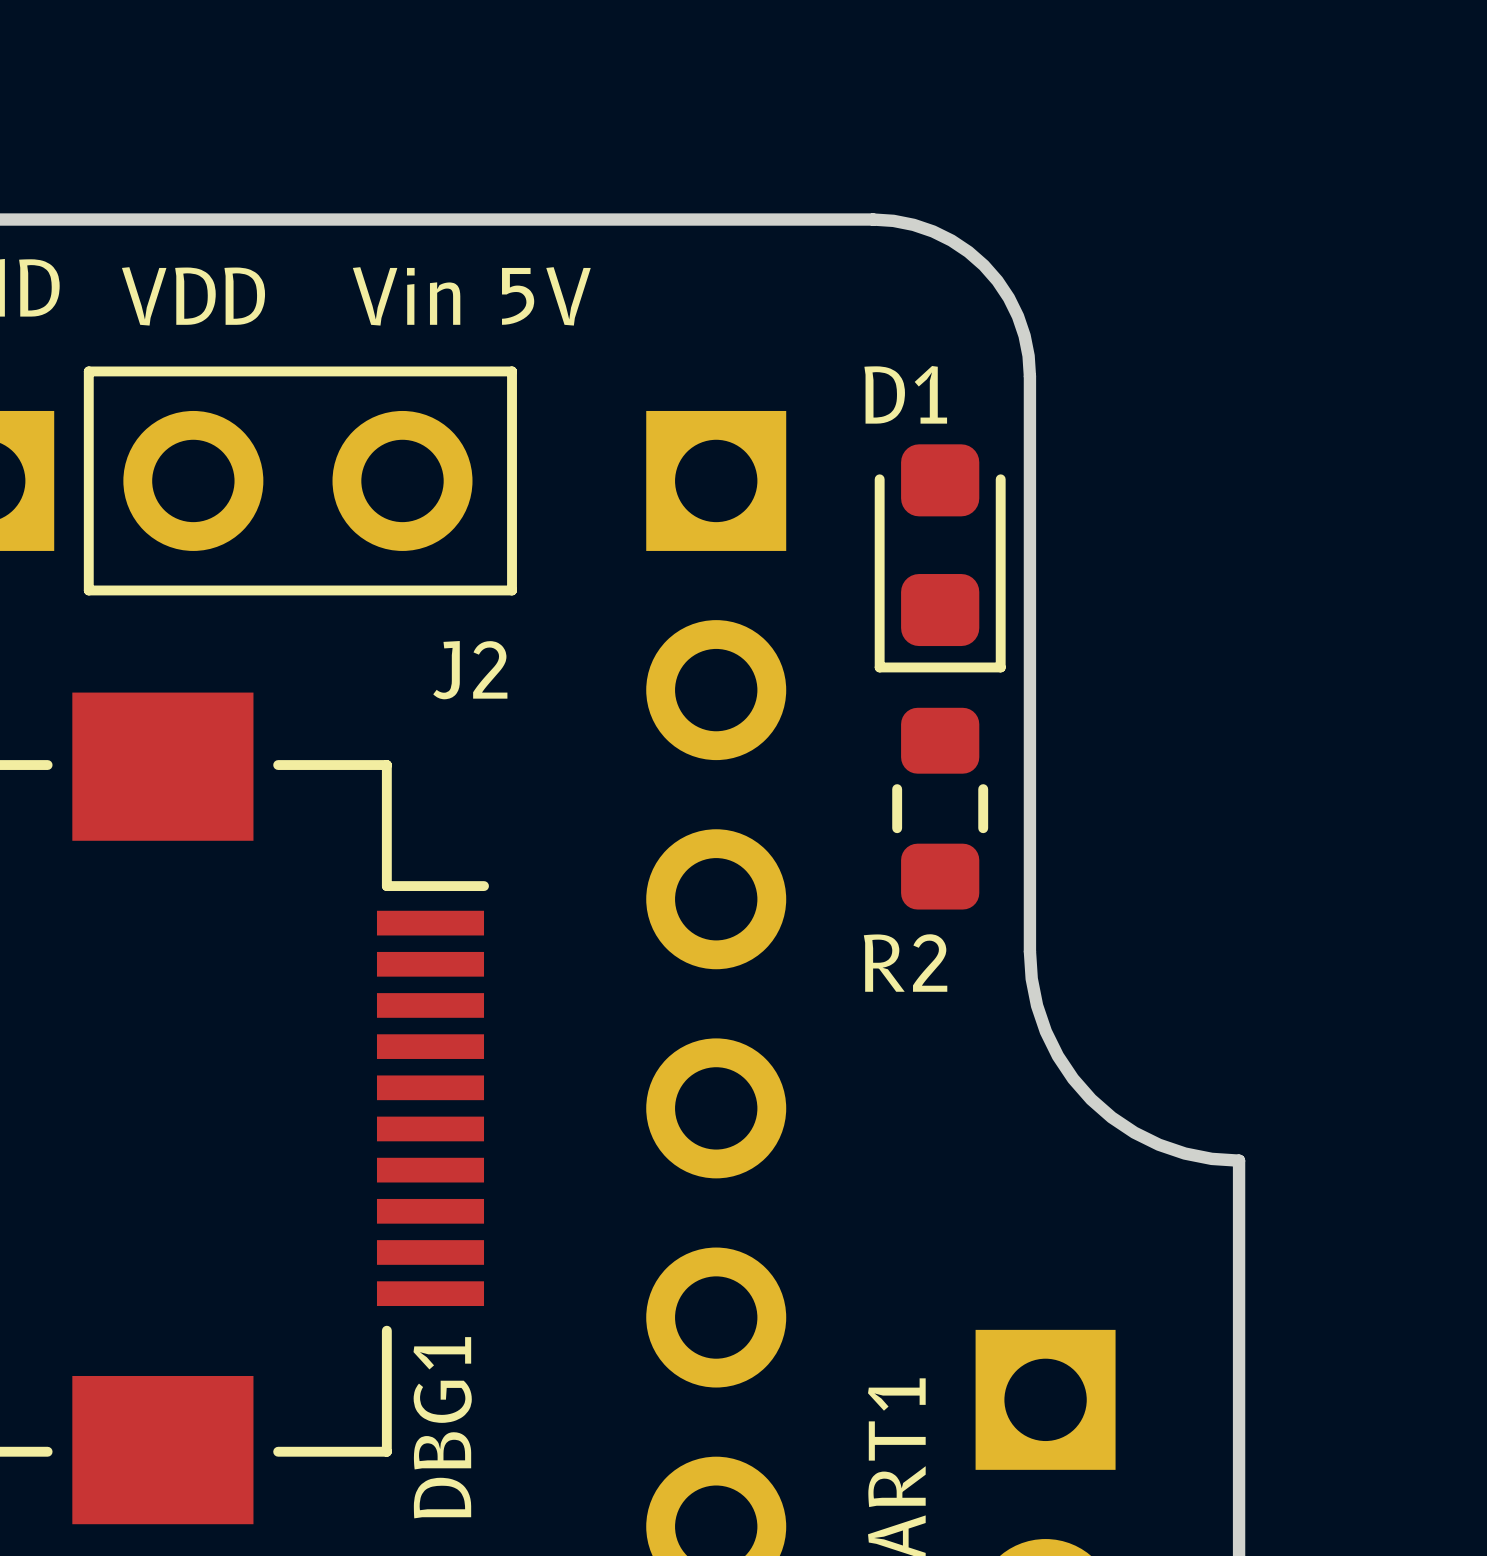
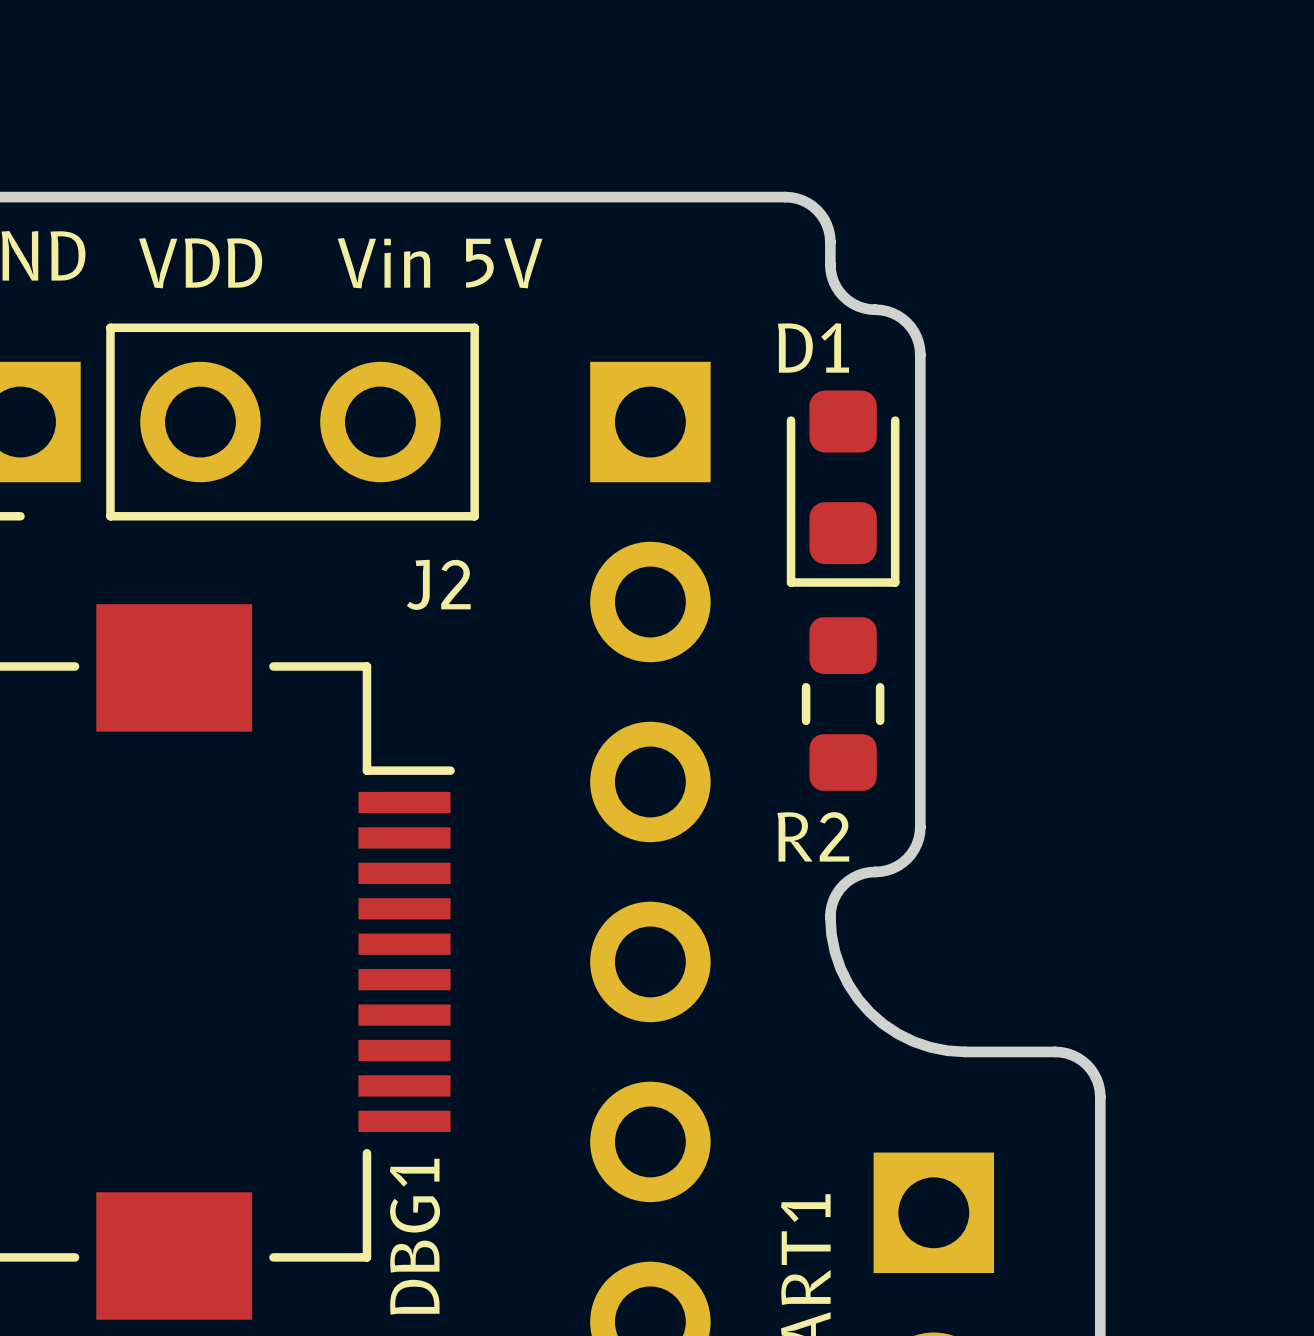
board edge: (873, 219) (913, 224) (951, 240) (983, 265) (997, 280) (1008, 297) (1024, 335) (1028, 355) (1029, 402) -> (785, 197) (797, 198) (807, 203) (817, 210) (824, 219) (829, 236) (831, 276) (839, 292) (847, 300) (858, 306) (886, 311) (902, 319) (911, 327) (916, 337) (920, 354)
board edge: (1029, 951) (1031, 978) (1037, 1005) (1045, 1031) (1057, 1056) (1073, 1078) (1091, 1099) (1111, 1117) (1134, 1132) (1159, 1144) (1184, 1153) (1211, 1158) (1239, 1160) (1239, 1265) -> (920, 826) (918, 838) (914, 849) (902, 862) (886, 870) (863, 873) (852, 877) (843, 885) (833, 899) (830, 916) (831, 934) (834, 951) (848, 984) (869, 1012) (883, 1024) (897, 1033) (930, 1047) (965, 1051) (1055, 1051) (1072, 1055) (1087, 1065) (1094, 1074) (1098, 1085) (1100, 1096)

